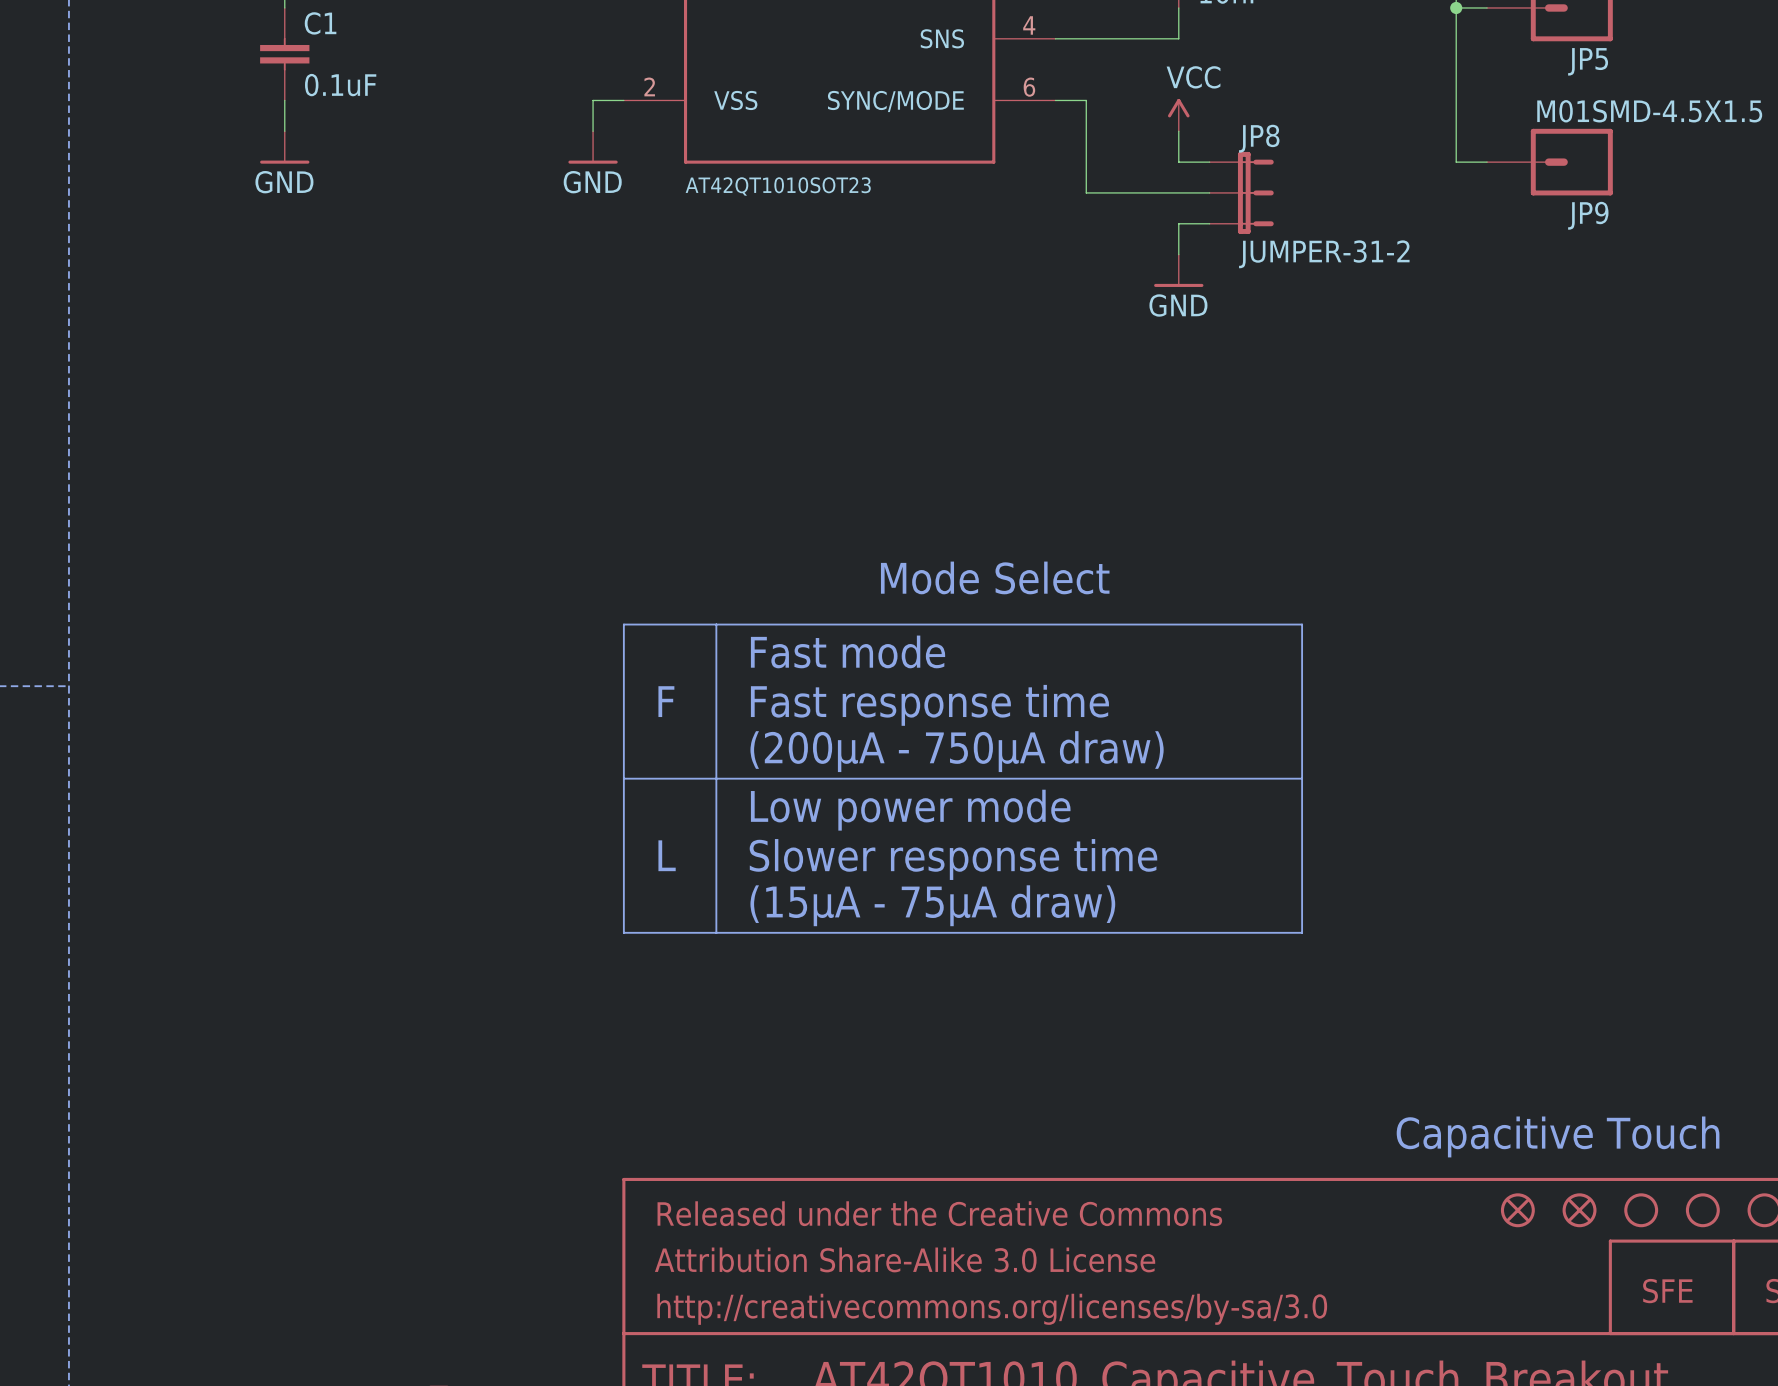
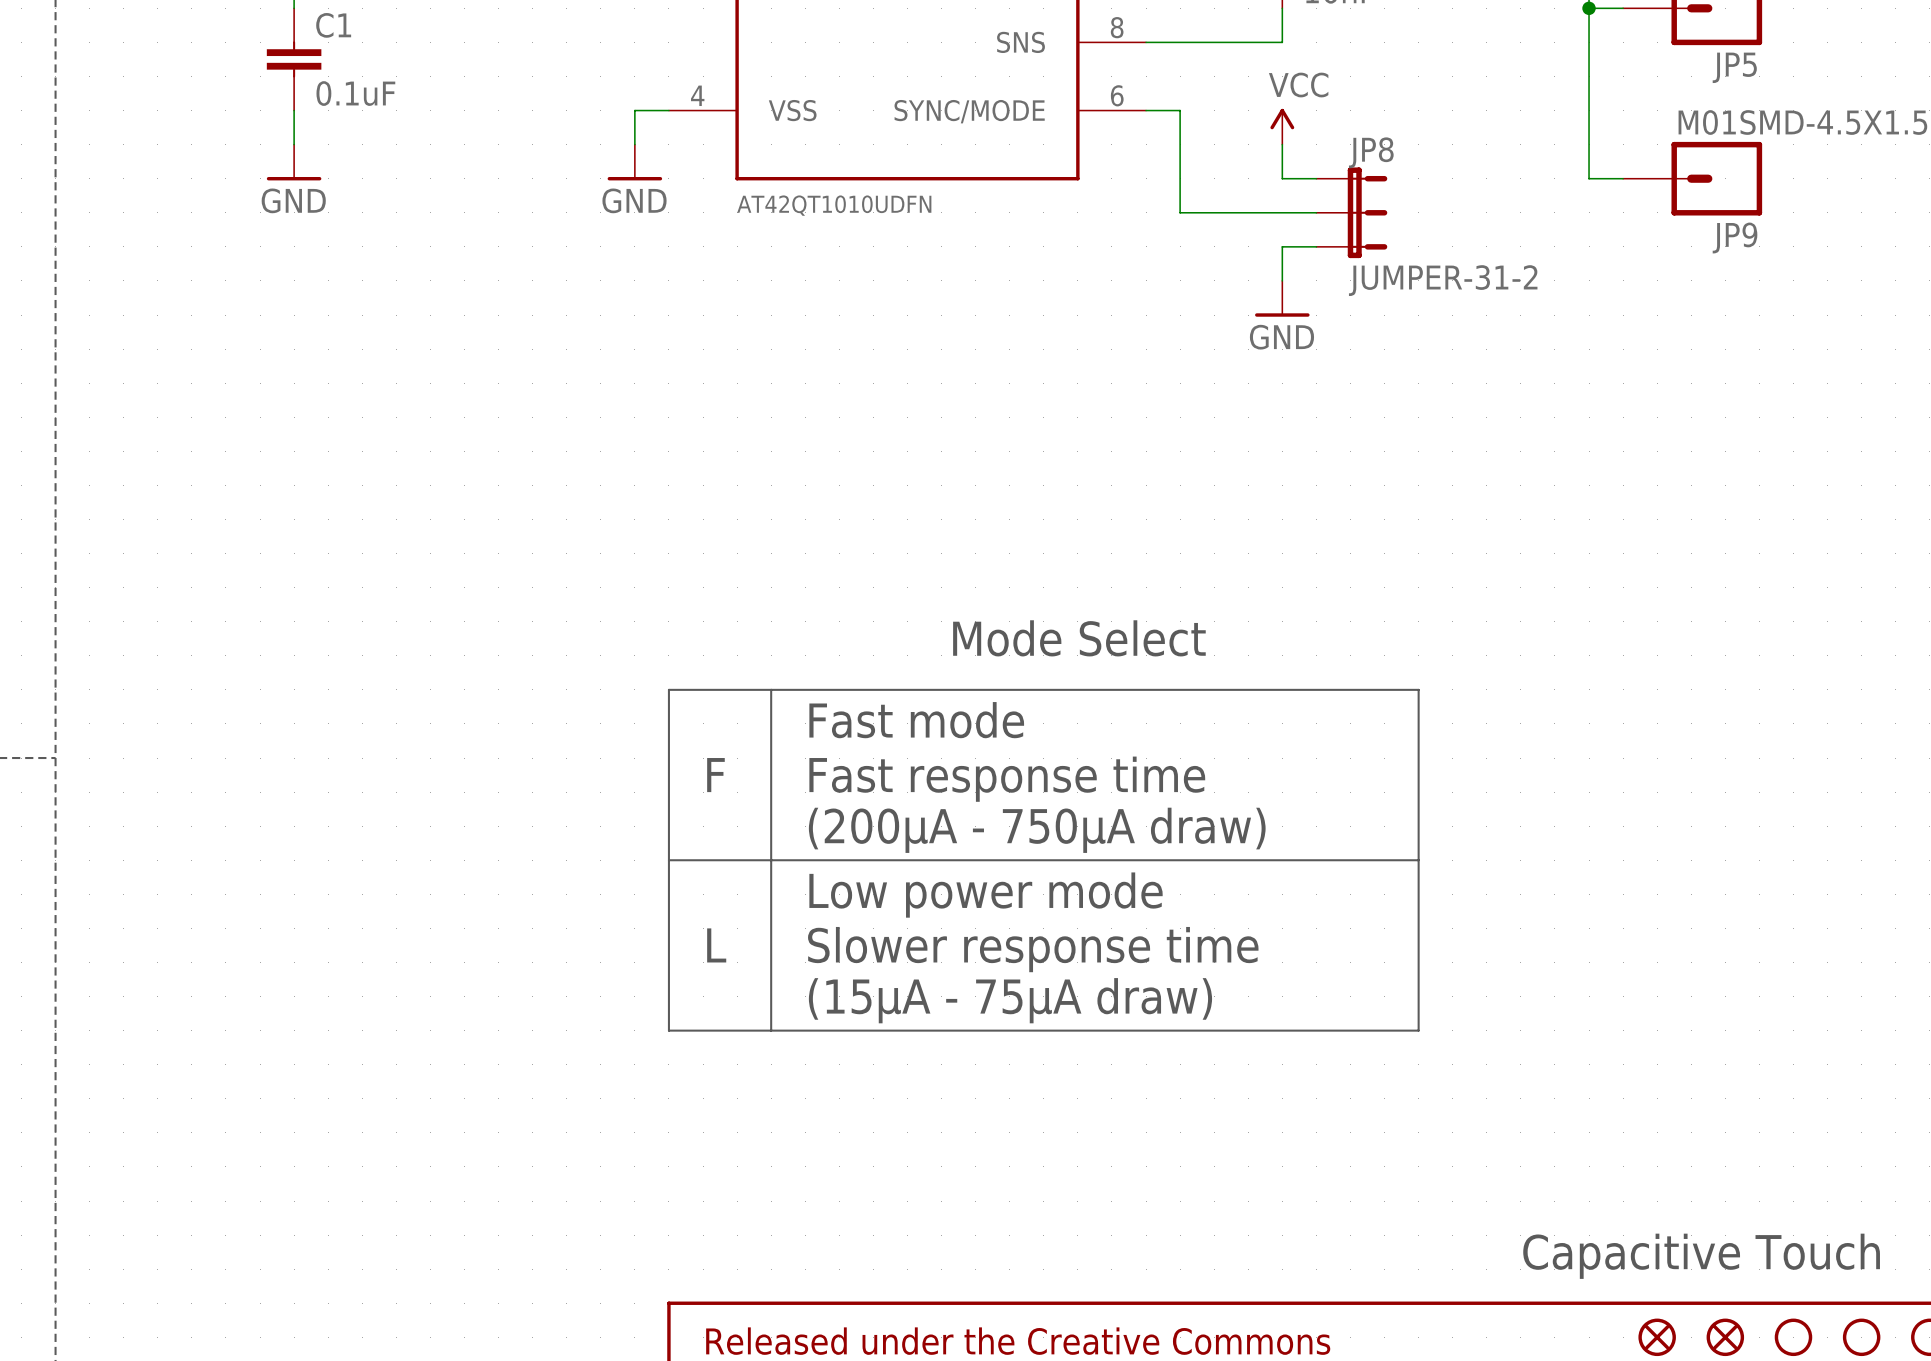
part pin number: 4 (1029, 25) -> 8 (1117, 27)
part pin number: 2 (649, 86) -> 4 (697, 95)
part value: AT42QT1010SOT23 (778, 186) -> AT42QT1010UDFN (834, 205)

